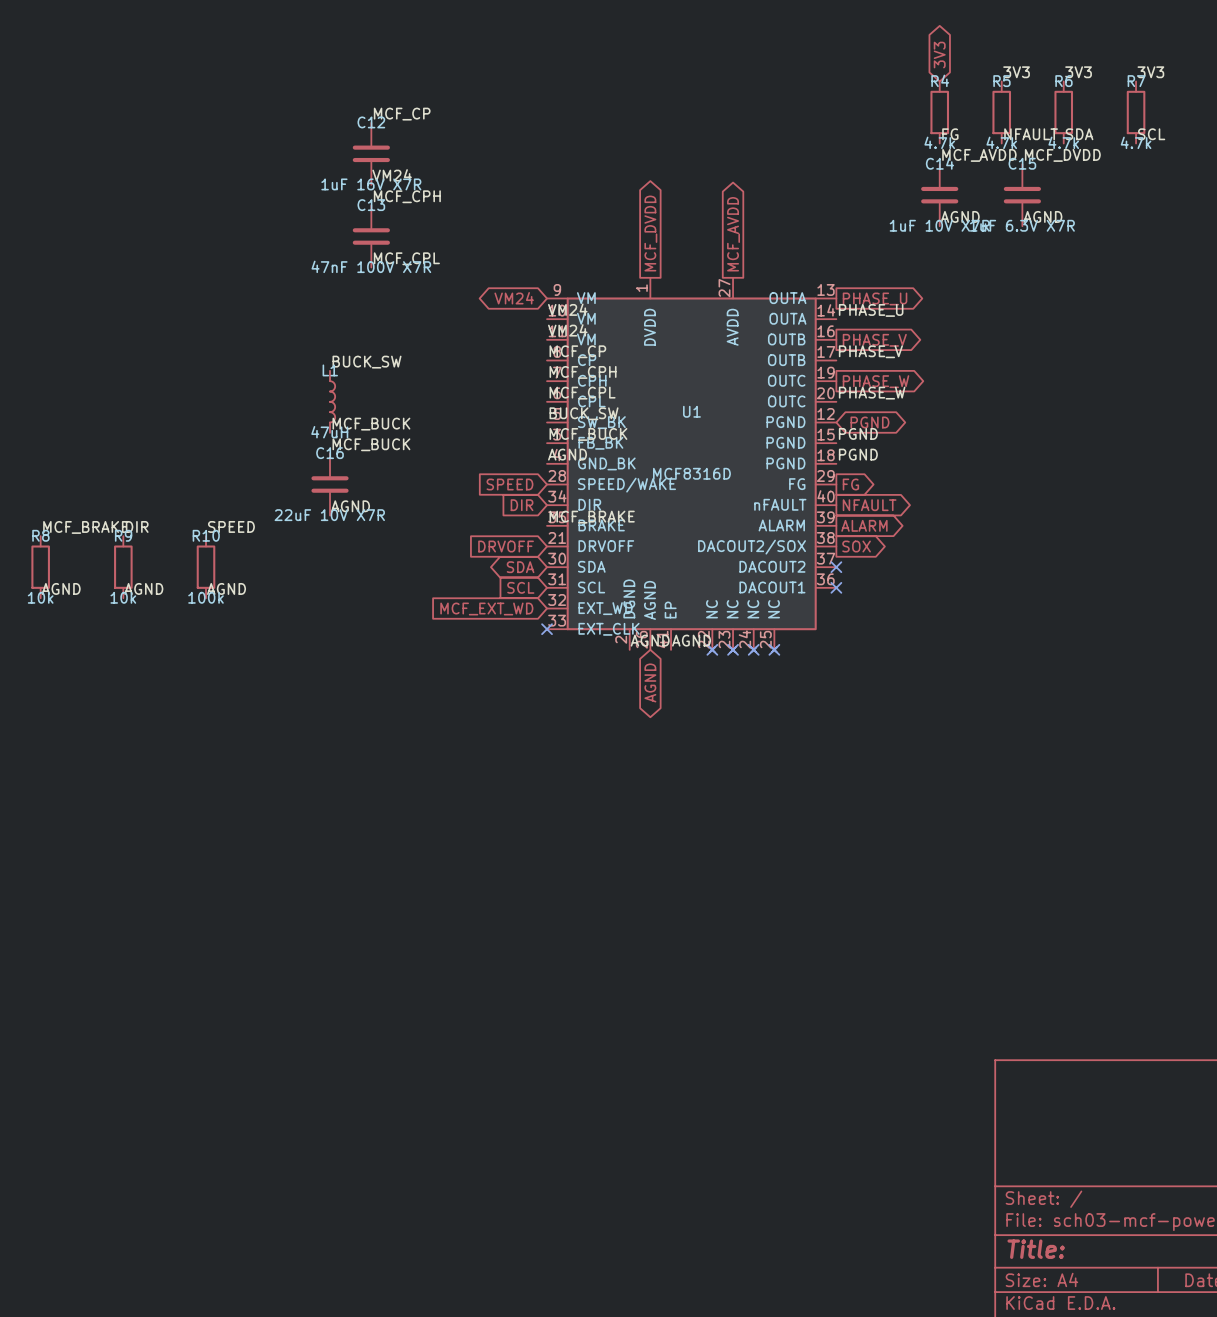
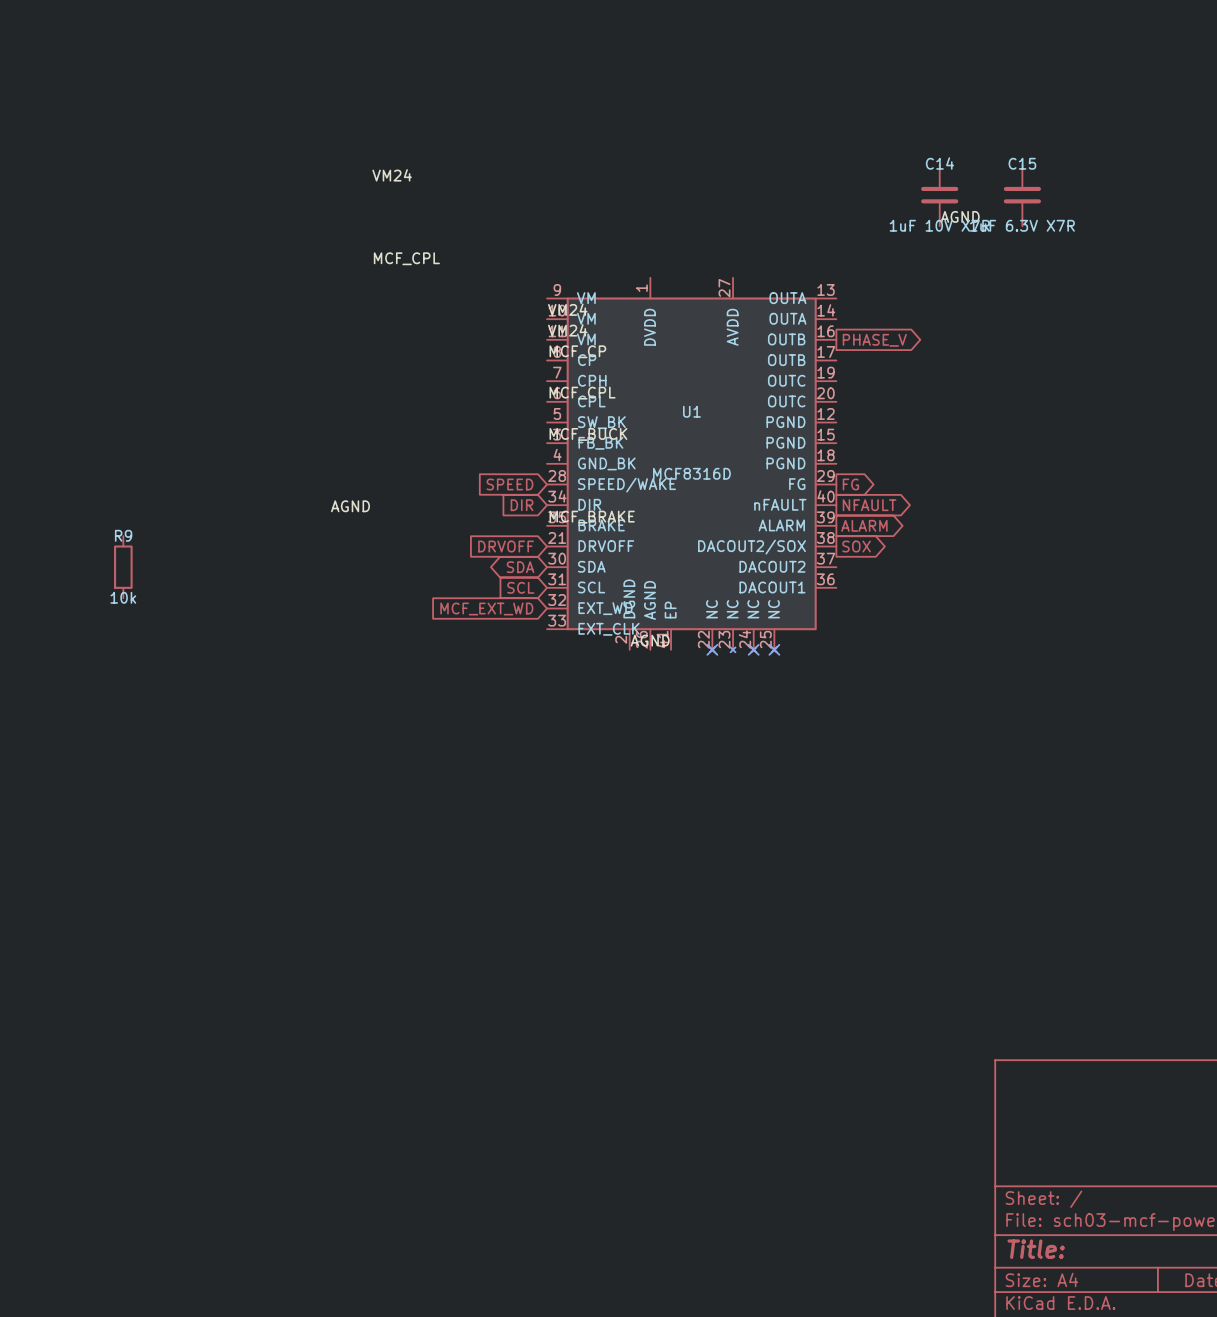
global label: 3V3 (939, 55) -> none
label: 3V3 (1016, 72) -> none
label: 3V3 (1078, 72) -> none
label: 3V3 (1150, 72) -> none
R4: 4.7k (939, 112) -> none
R5: 4.7k (1001, 112) -> none
R6: 4.7k (1063, 112) -> none
R7: 4.7k (1136, 112) -> none
label: MCF_CP (402, 114) -> none
label: FG (950, 134) -> none
label: NFAULT (1031, 134) -> none
label: SDA (1079, 134) -> none
label: SCL (1151, 134) -> none
C12: 1uF 16V X7R (371, 153) -> none
label: MCF_AVDD (979, 155) -> none
label: MCF_DVDD (1062, 155) -> none
label: MCF_CPH (407, 196) -> none
label: AGND (1042, 216) -> none
global label: MCF_DVDD (650, 233) -> none
global label: MCF_AVDD (733, 234) -> none
C13: 47nF 100V X7R (371, 236) -> none
global label: VM24 (514, 298) -> none
global label: PHASE_U (875, 298) -> none
label: PHASE_U (871, 310) -> none
label: PHASE_V (870, 351) -> none
label: BUCK_SW (367, 362) -> none
label: MCF_CPH (583, 372) -> none
global label: PHASE_W (876, 381) -> none
label: PHASE_W (872, 393) -> none
L1: 47uH (332, 401) -> none
label: BUCK_SW (584, 413) -> none
global label: PGND (869, 422) -> none
label: MCF_BUCK (371, 424) -> none
label: PGND (858, 433) -> none
label: MCF_BUCK (371, 444) -> none
label: AGND (567, 454) -> none
label: PGND (858, 454) -> none
C16: 22uF 10V X7R (330, 484) -> none
label: DIR (137, 526) -> none
label: SPEED (231, 526) -> none
label: MCF_BRAKE (85, 527) -> none
R8: 10k (40, 567) -> none
R10: 100k (206, 567) -> none
no-connect mark: (836, 567) -> none
no-connect mark: (836, 587) -> none
label: AGND (61, 588) -> none
label: AGND (143, 588) -> none
label: AGND (226, 588) -> none
no-connect mark: (547, 629) -> none
label: AGND (691, 640) -> none
no-connect mark: (733, 649) -> none
global label: AGND (650, 682) -> none

